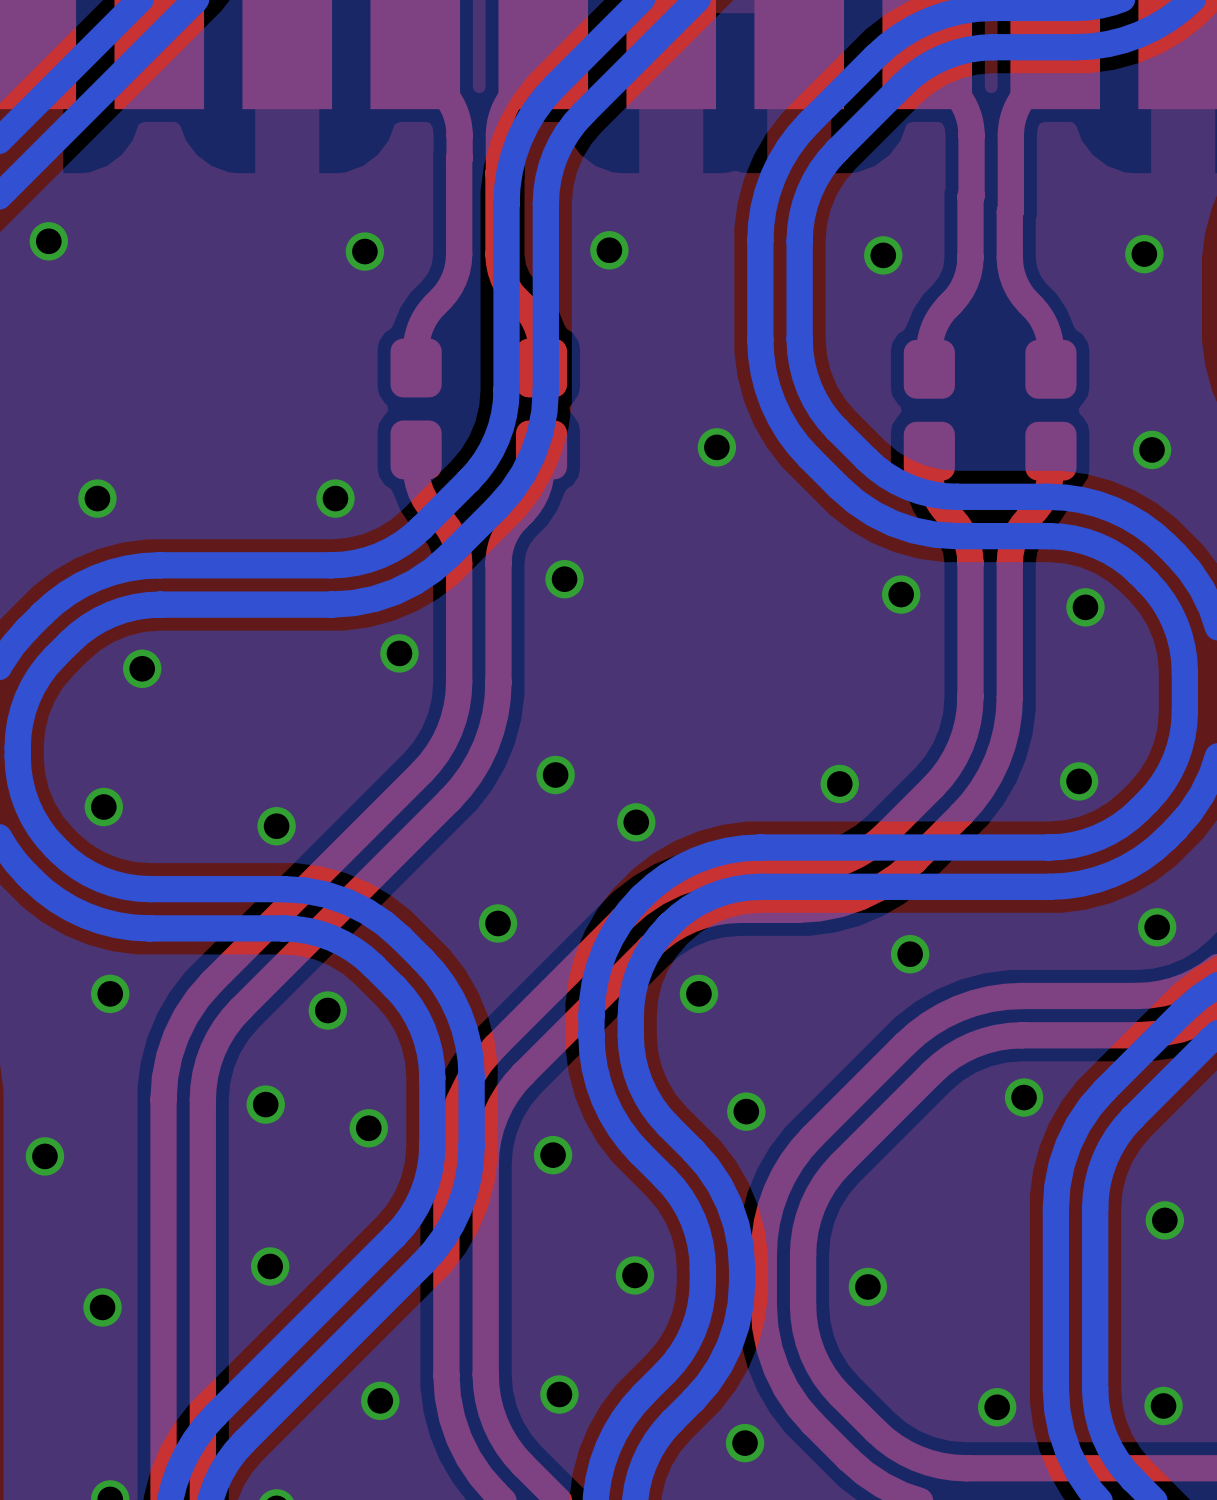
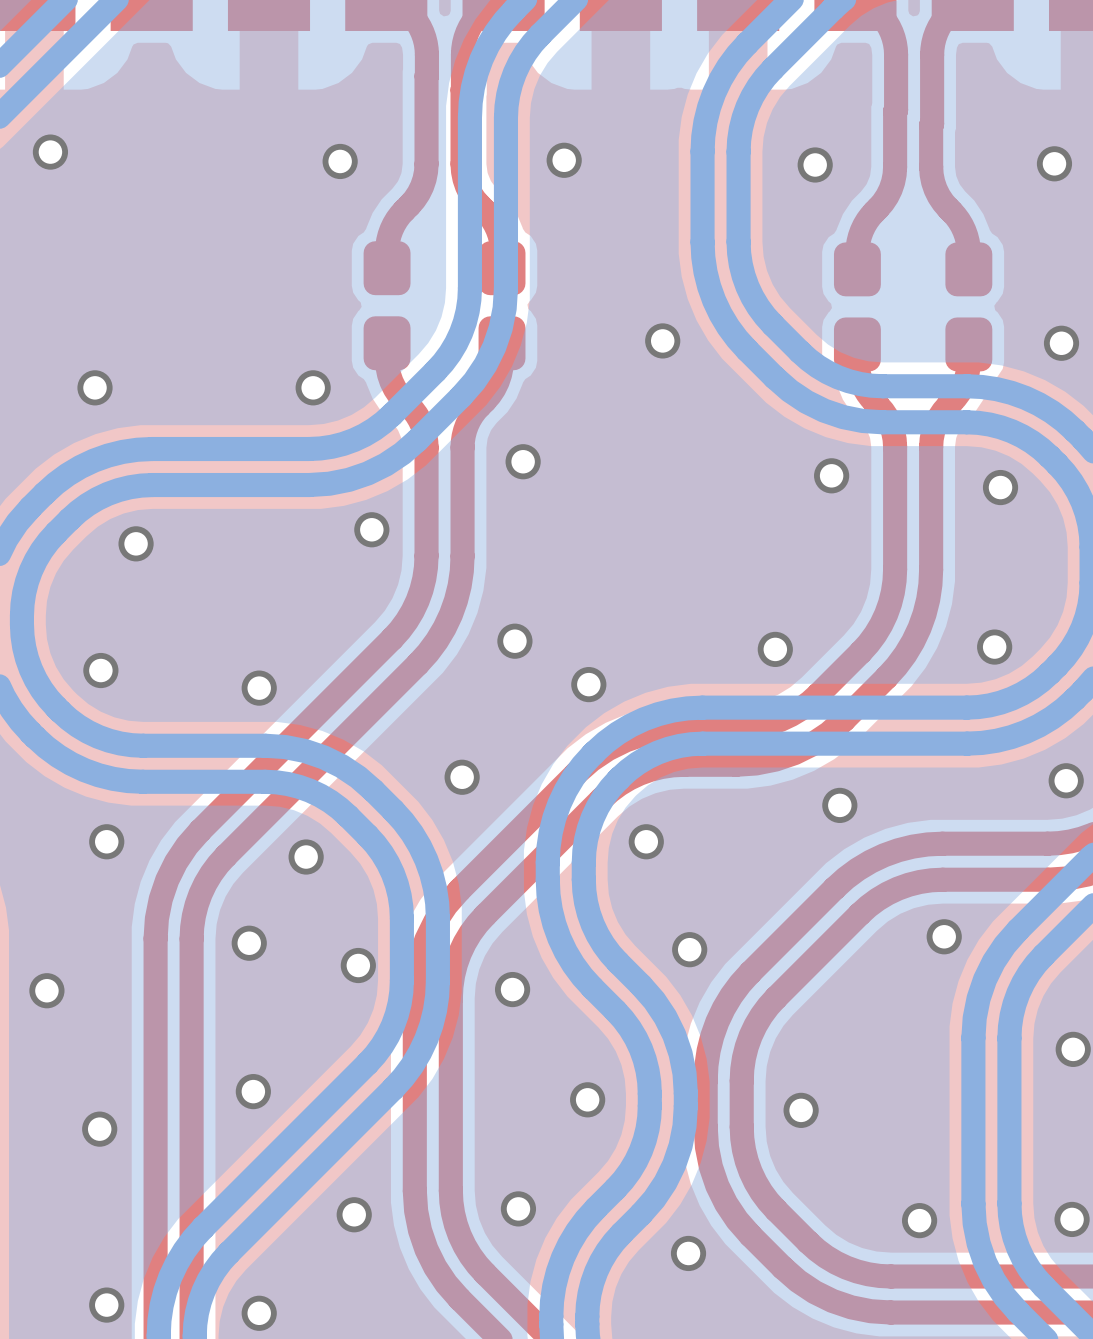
via position: (368, 1128) -> (358, 965)

